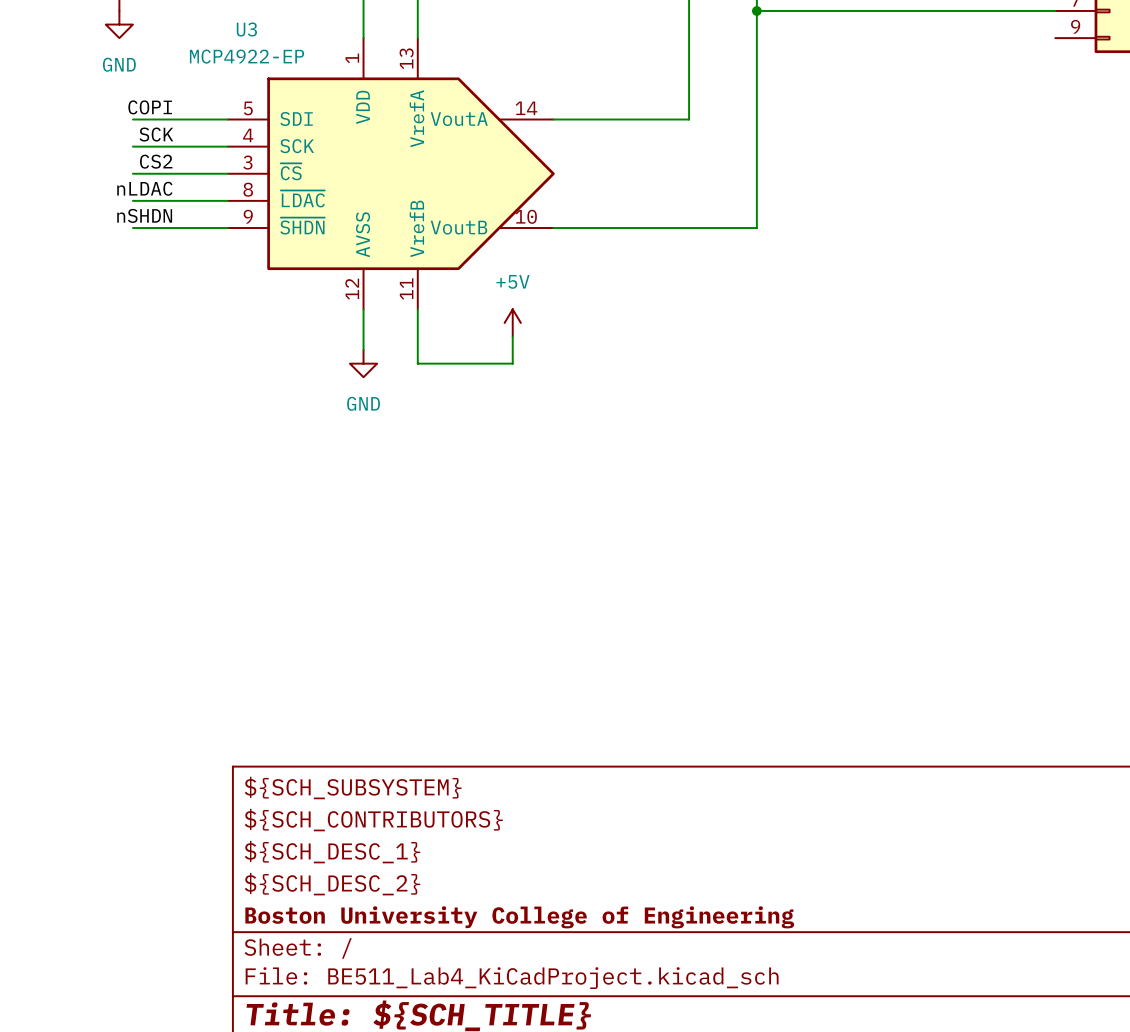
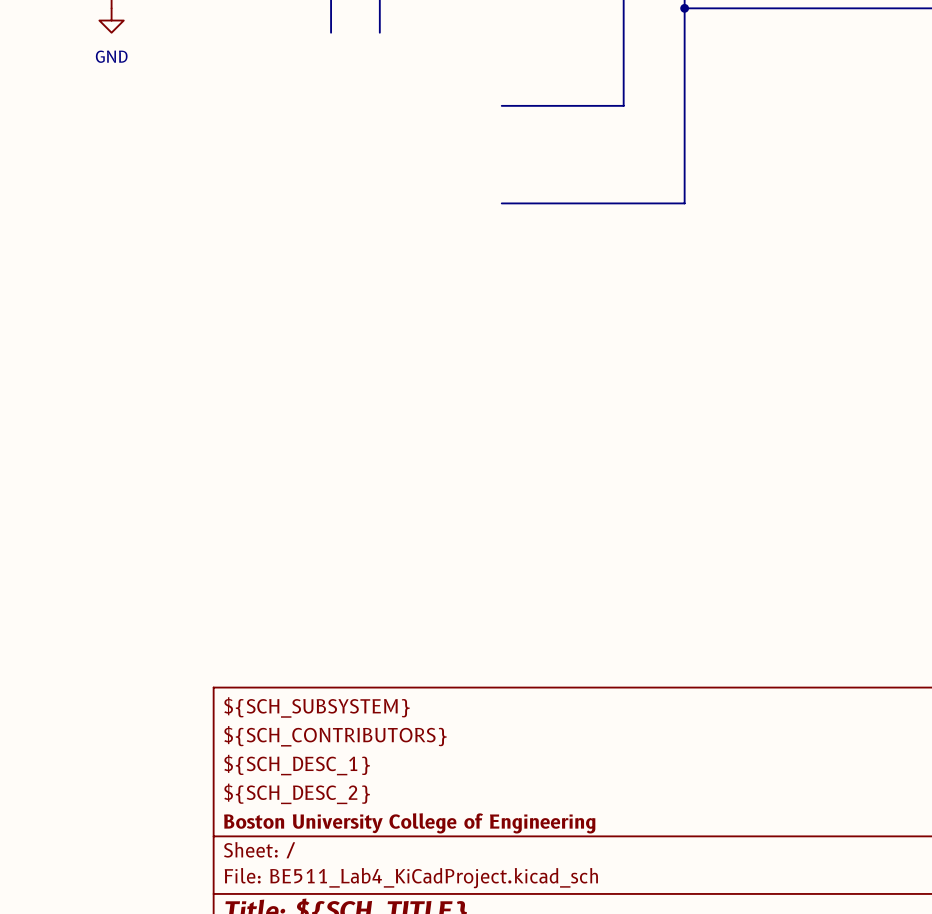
label: COPI (150, 107) -> none
wire: (132, 119) (227, 119) -> none
label: SCK (156, 134) -> none
wire: (132, 146) (227, 146) -> none
label: CS2 (156, 161) -> none
wire: (132, 173) (227, 173) -> none
U3: MCP4922-EP (391, 173) -> none
label: nLDAC (144, 188) -> none
wire: (132, 200) (227, 200) -> none
label: nSHDN (144, 215) -> none
wire: (132, 228) (227, 228) -> none
wire: (363, 309) (363, 350) -> none
wire: (417, 309) (417, 363) (512, 363) (512, 336) -> none
power symbol: +5V (512, 322) -> none
power symbol: GND (363, 363) -> none

